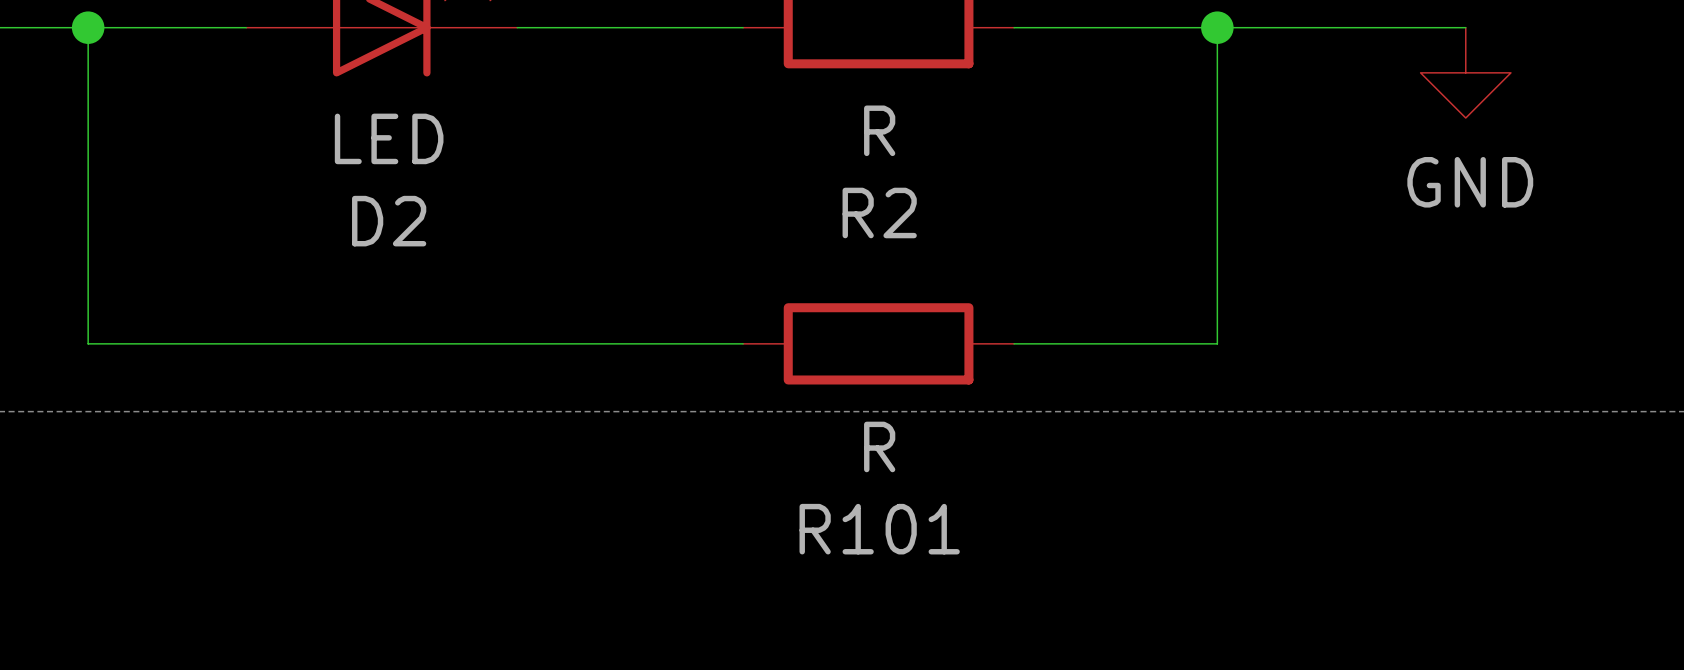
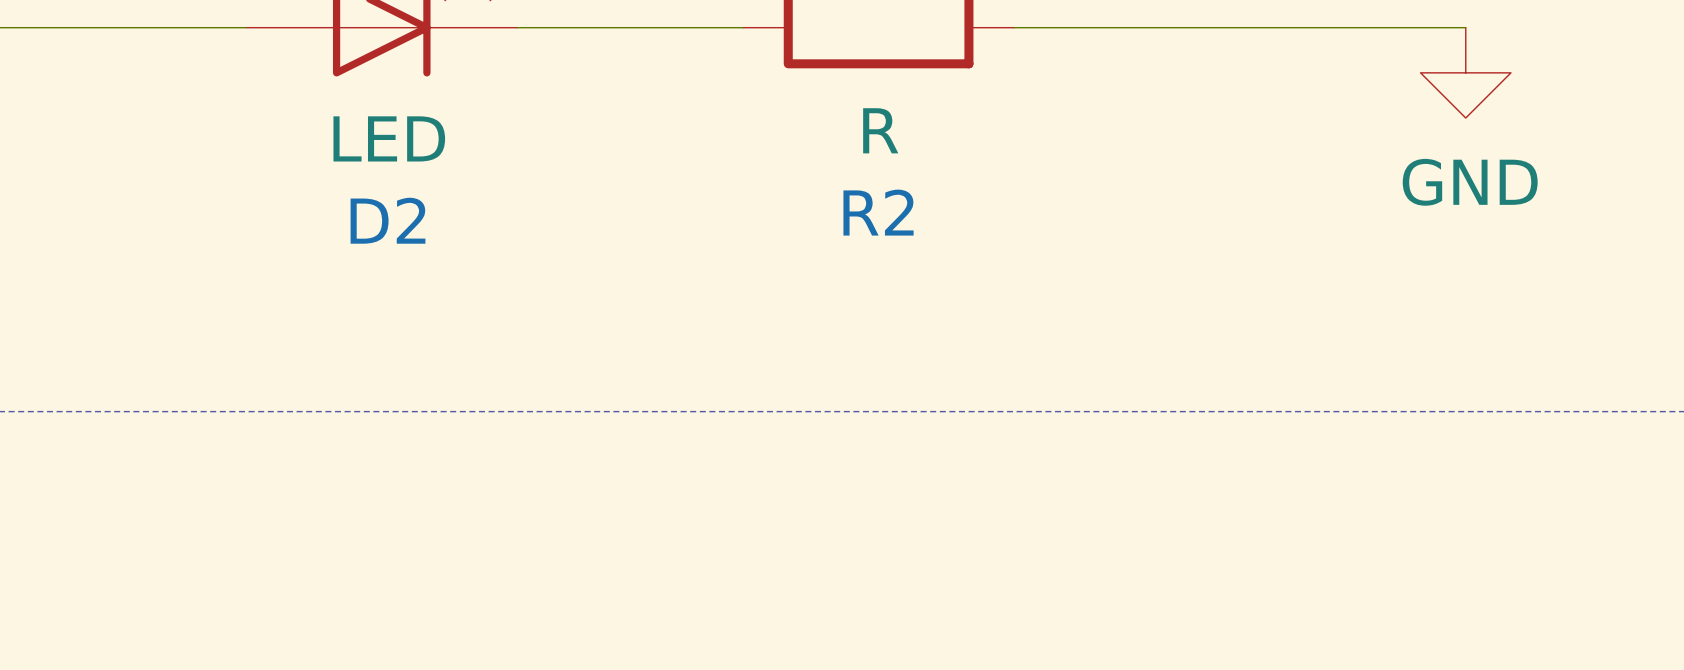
wire: (88, 27) (88, 343) (743, 343) -> none
junction: (88, 27) -> none
wire: (1217, 27) (1217, 343) (1014, 343) -> none
junction: (1217, 27) -> none
R101: R (878, 343) -> none

